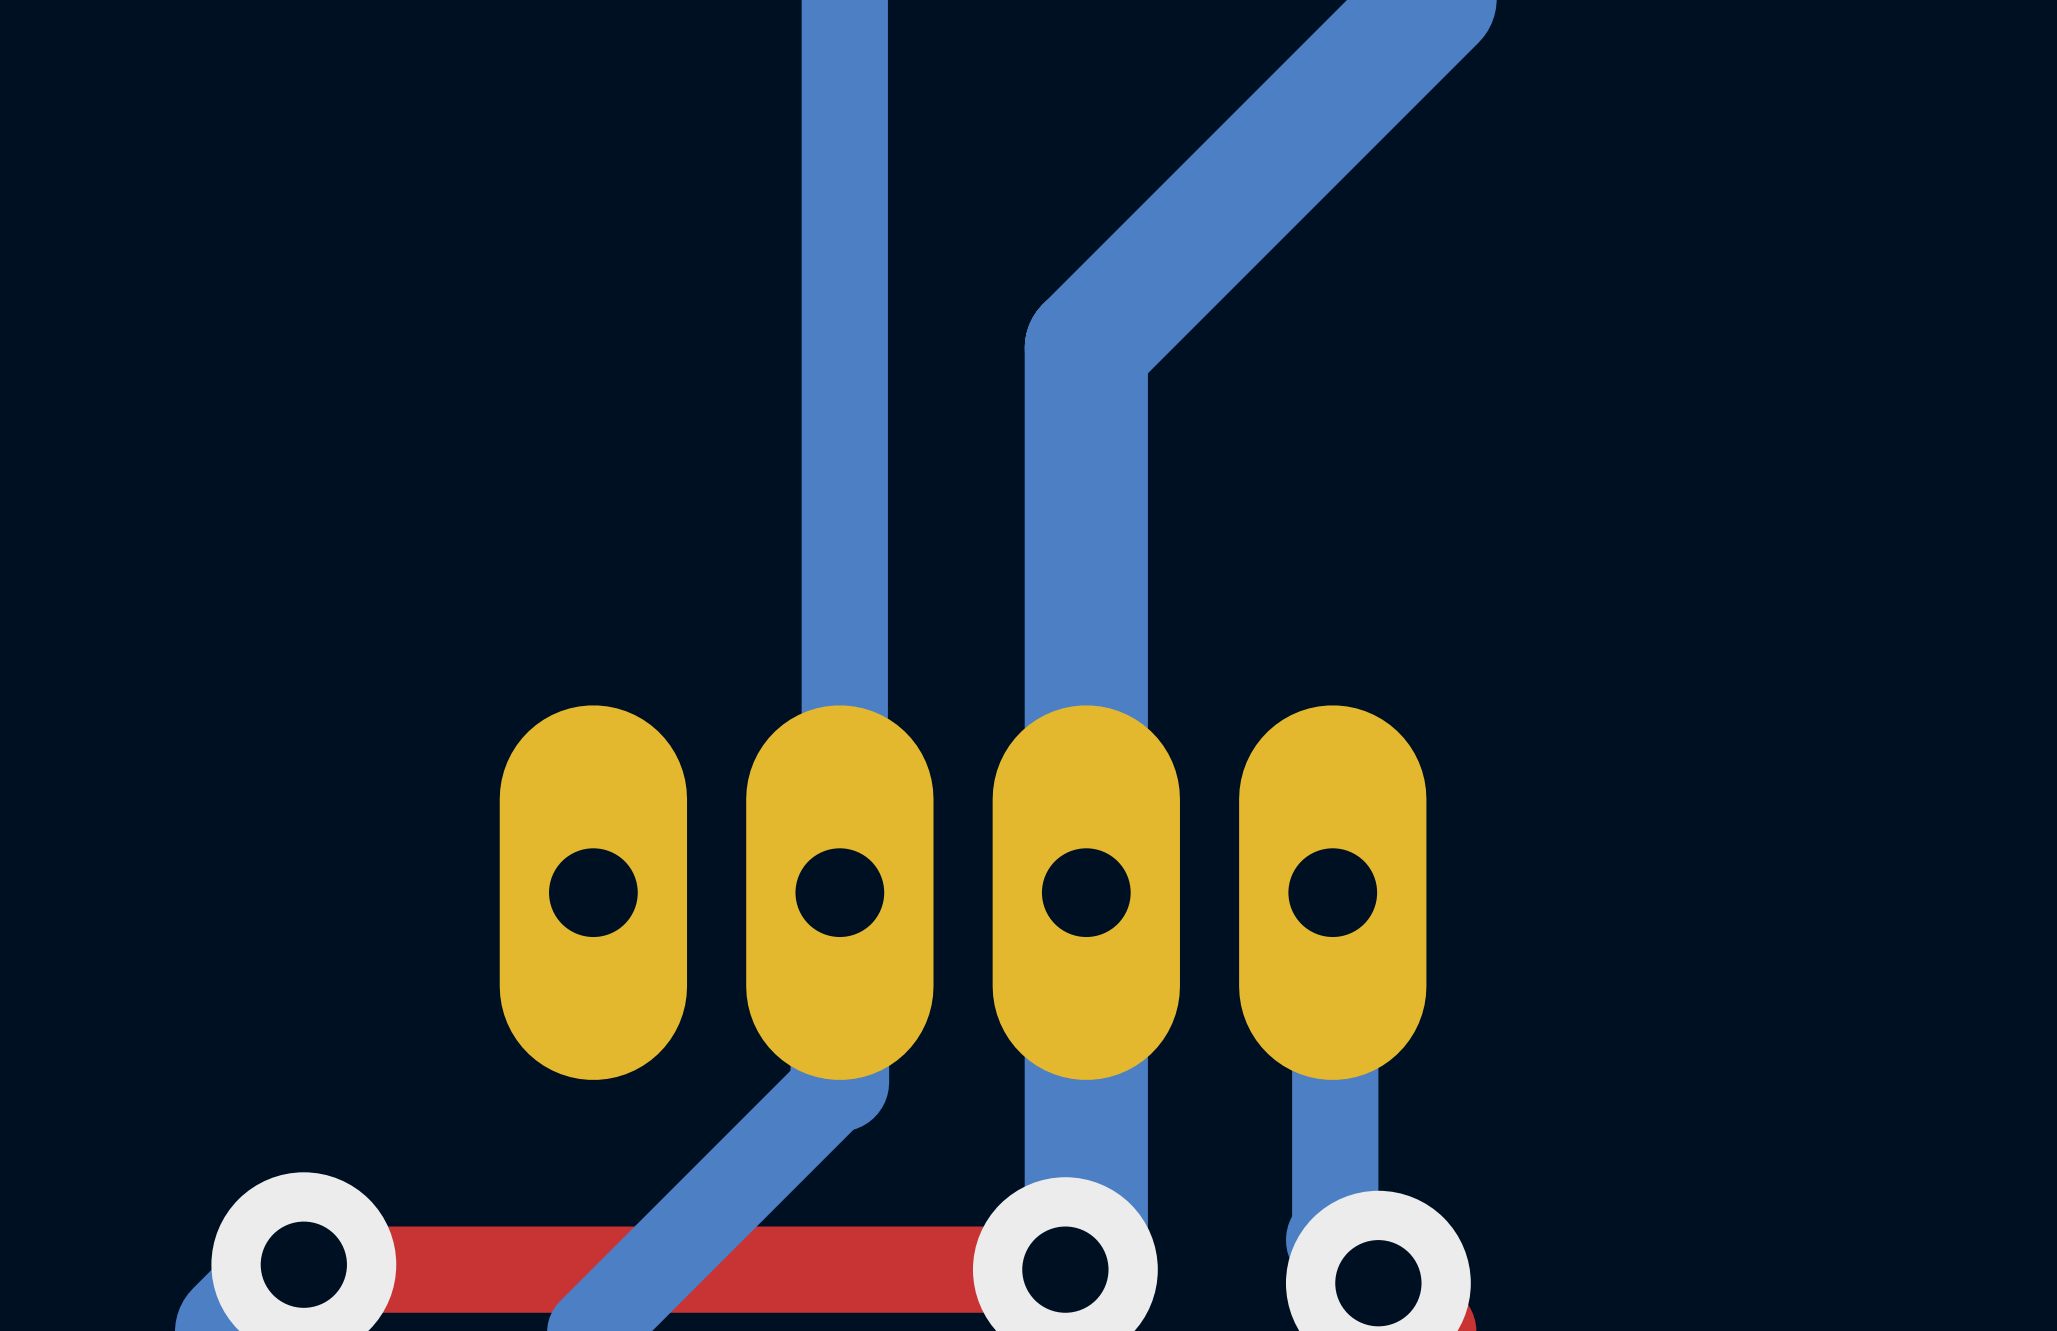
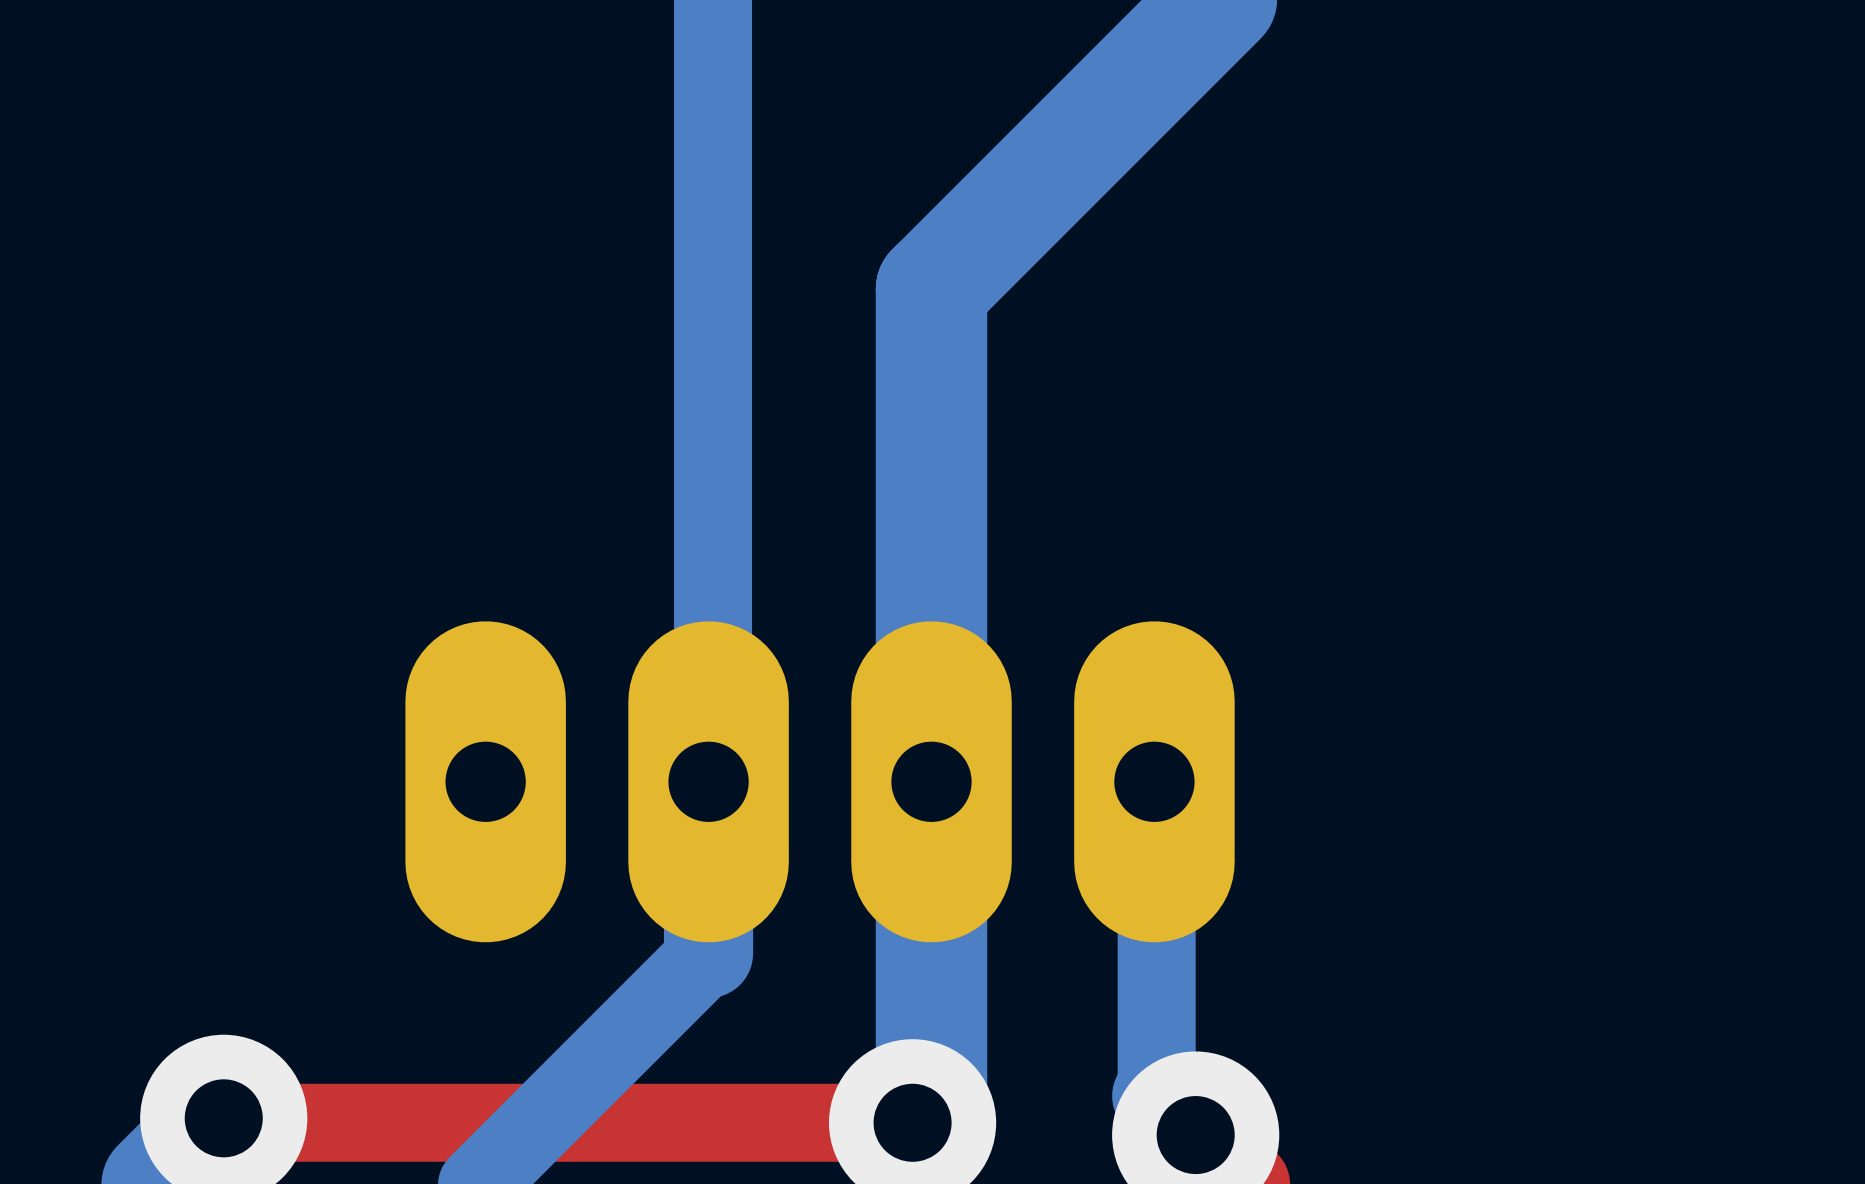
part footprint: [499, 705, 1427, 1080] -> [405, 621, 1235, 943]

